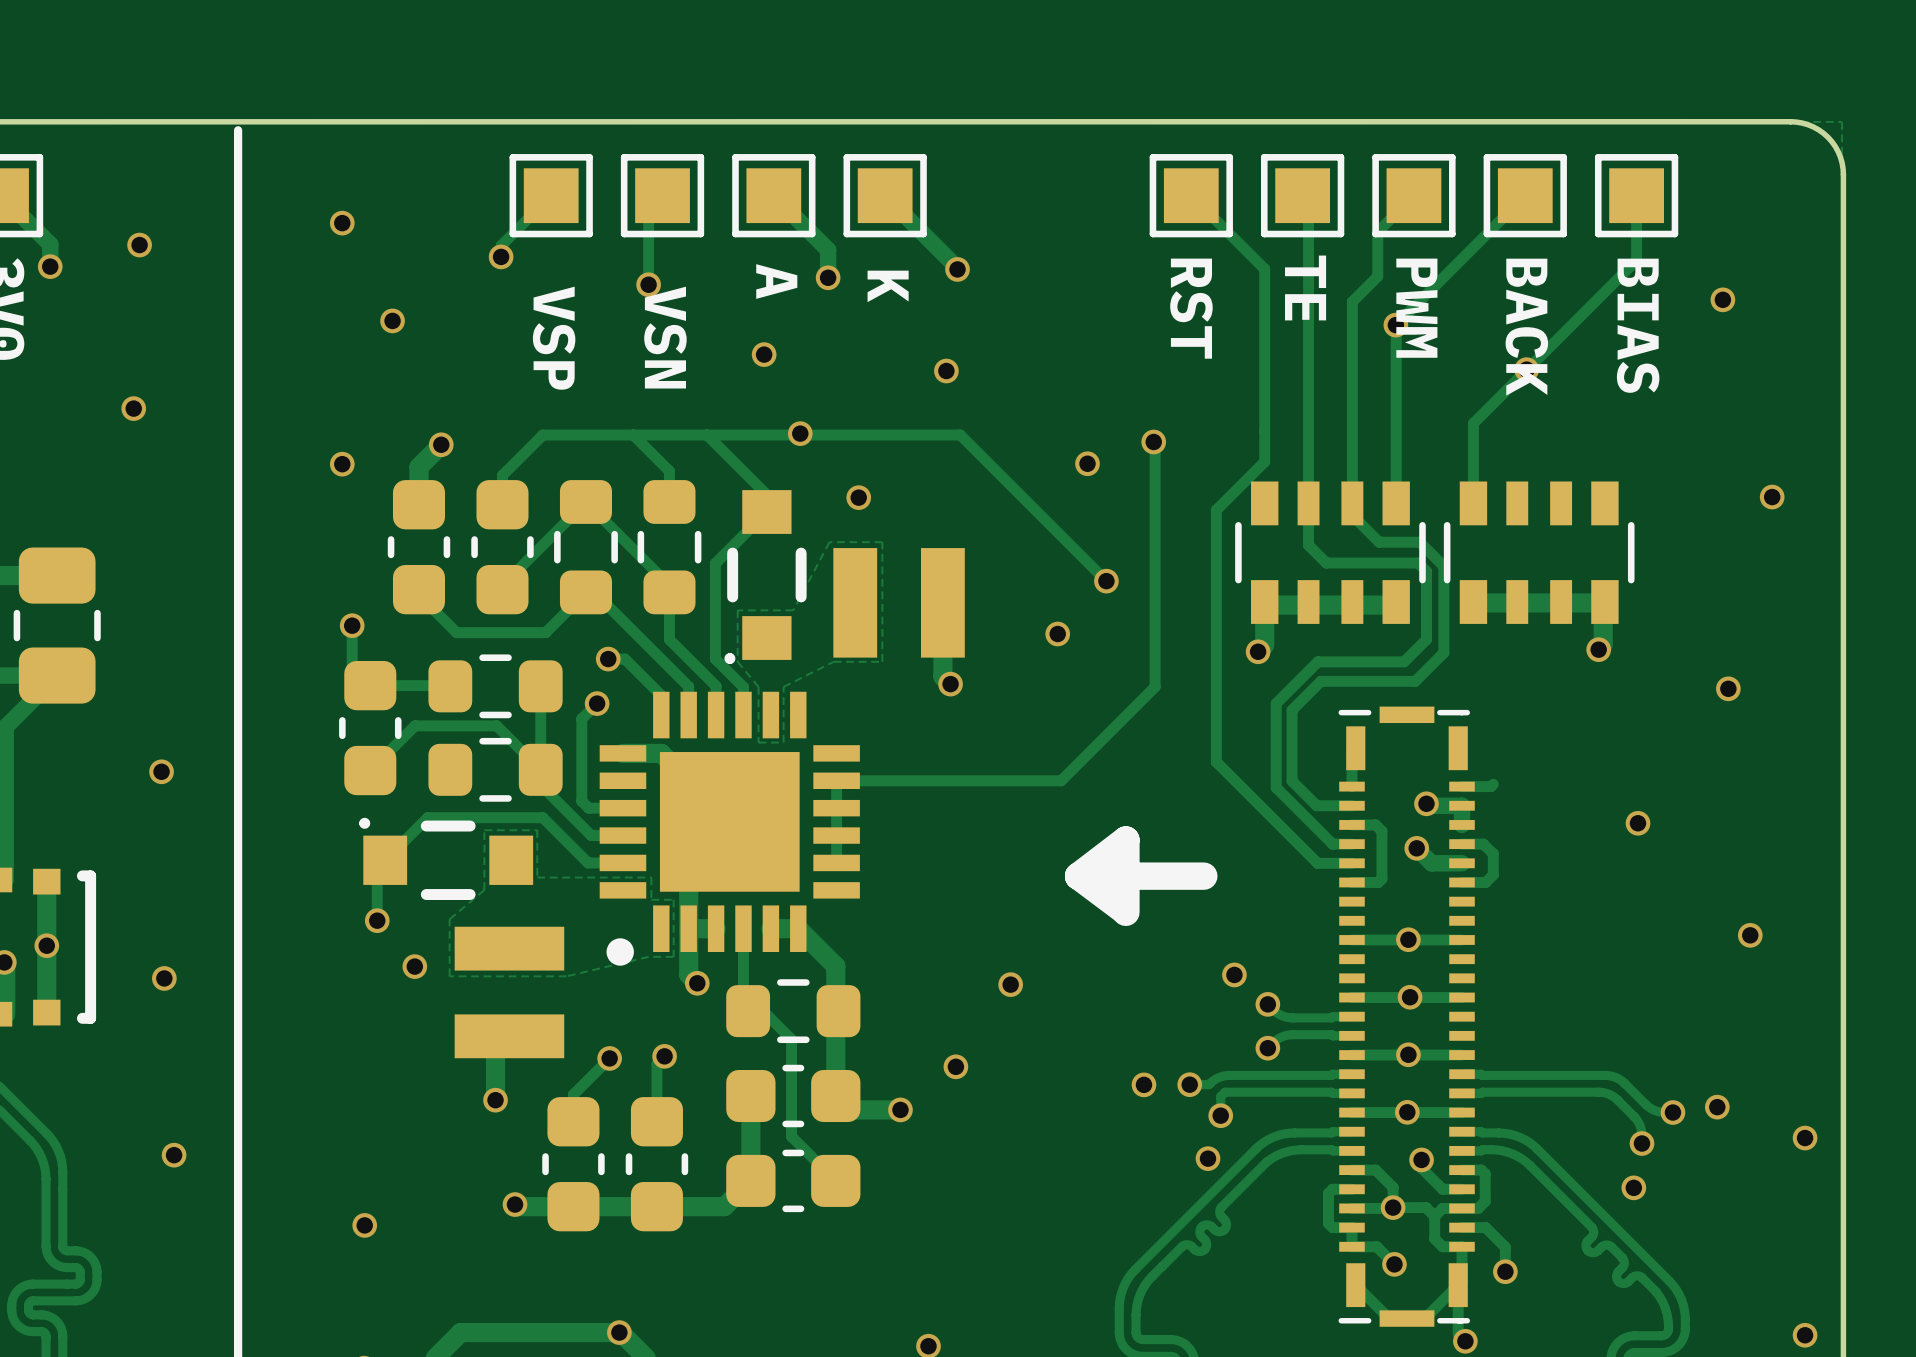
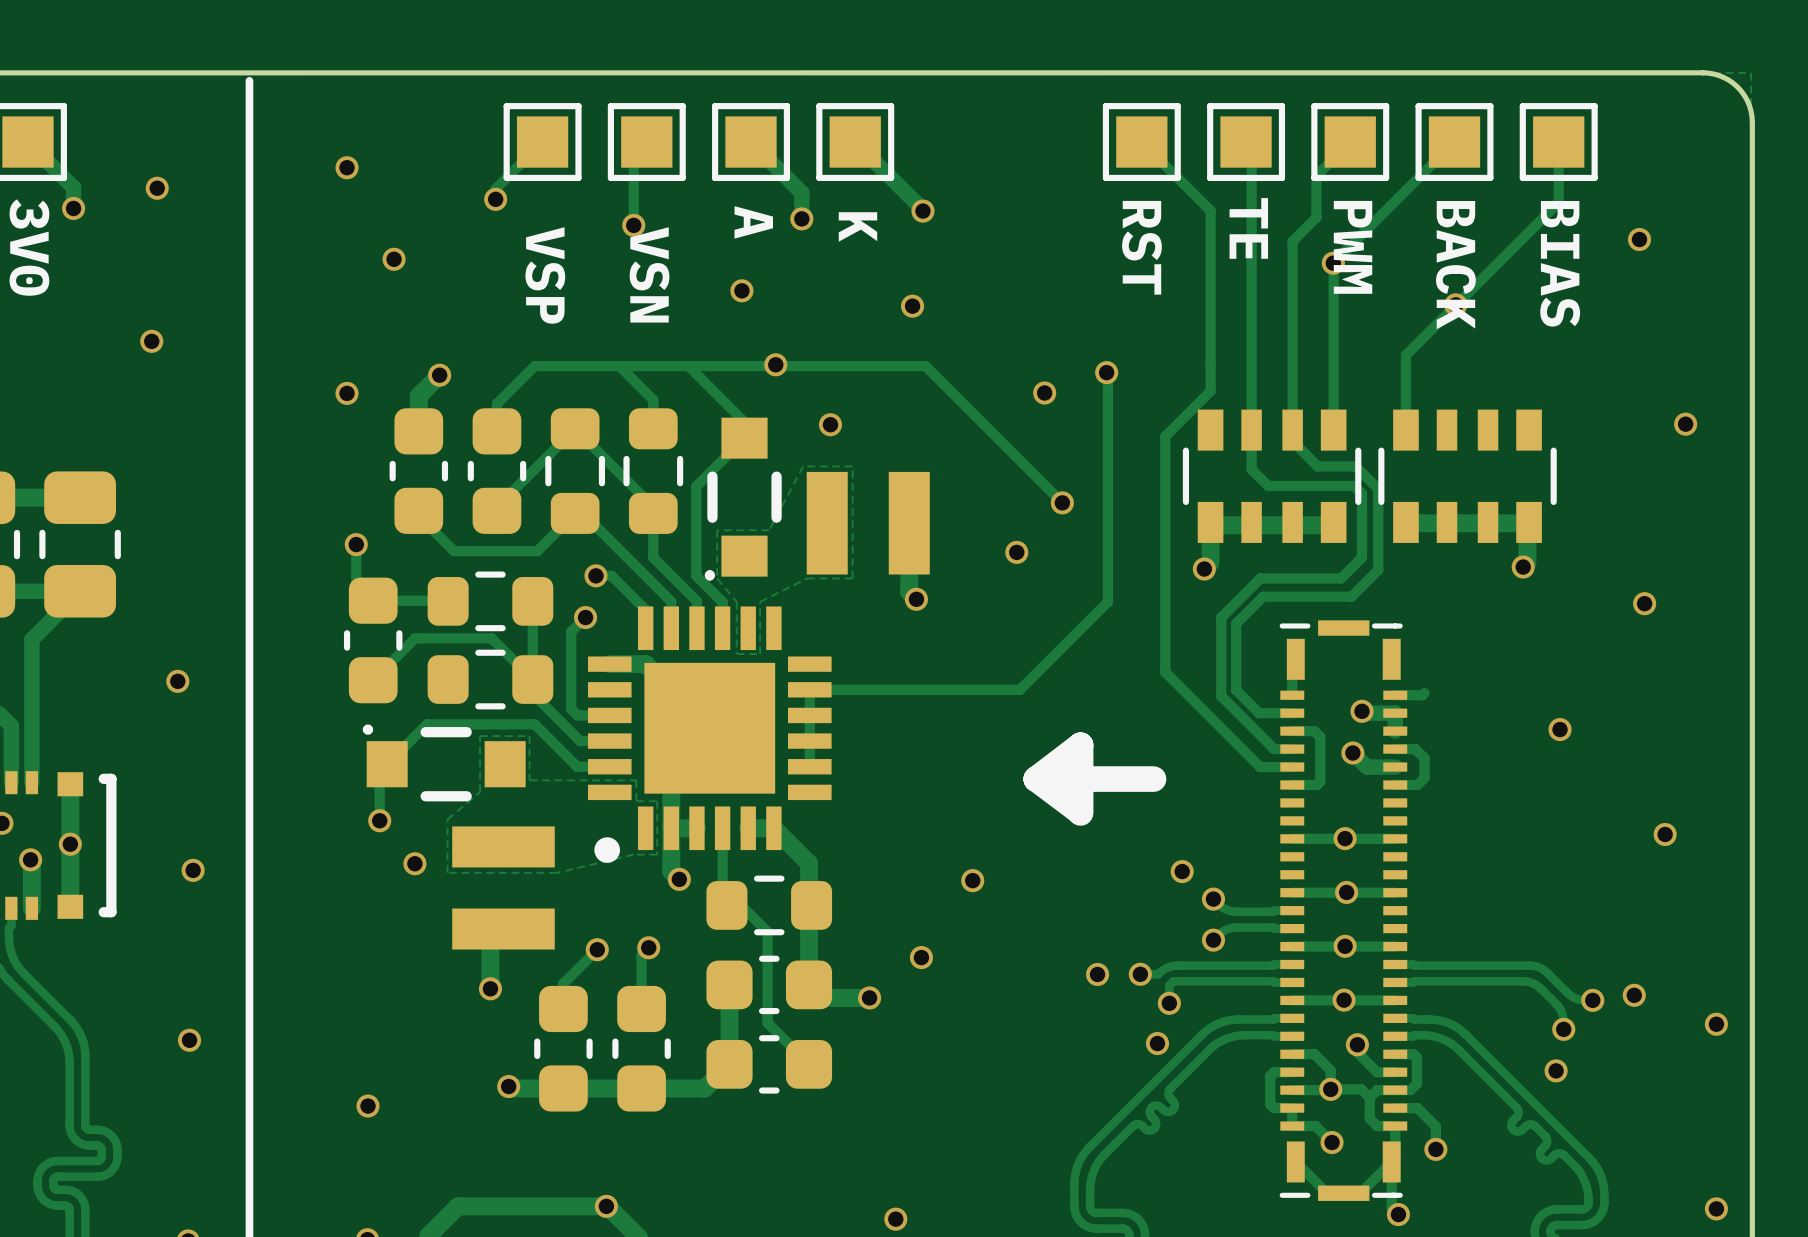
via position: (164, 978) -> (193, 870)

